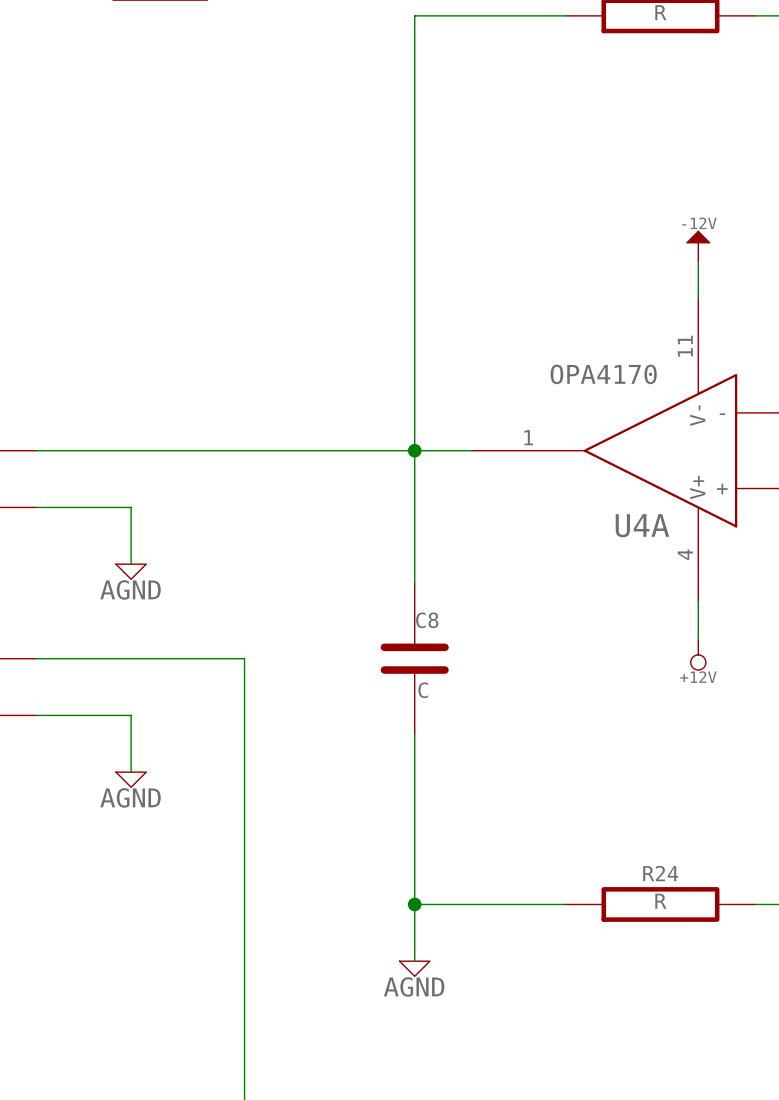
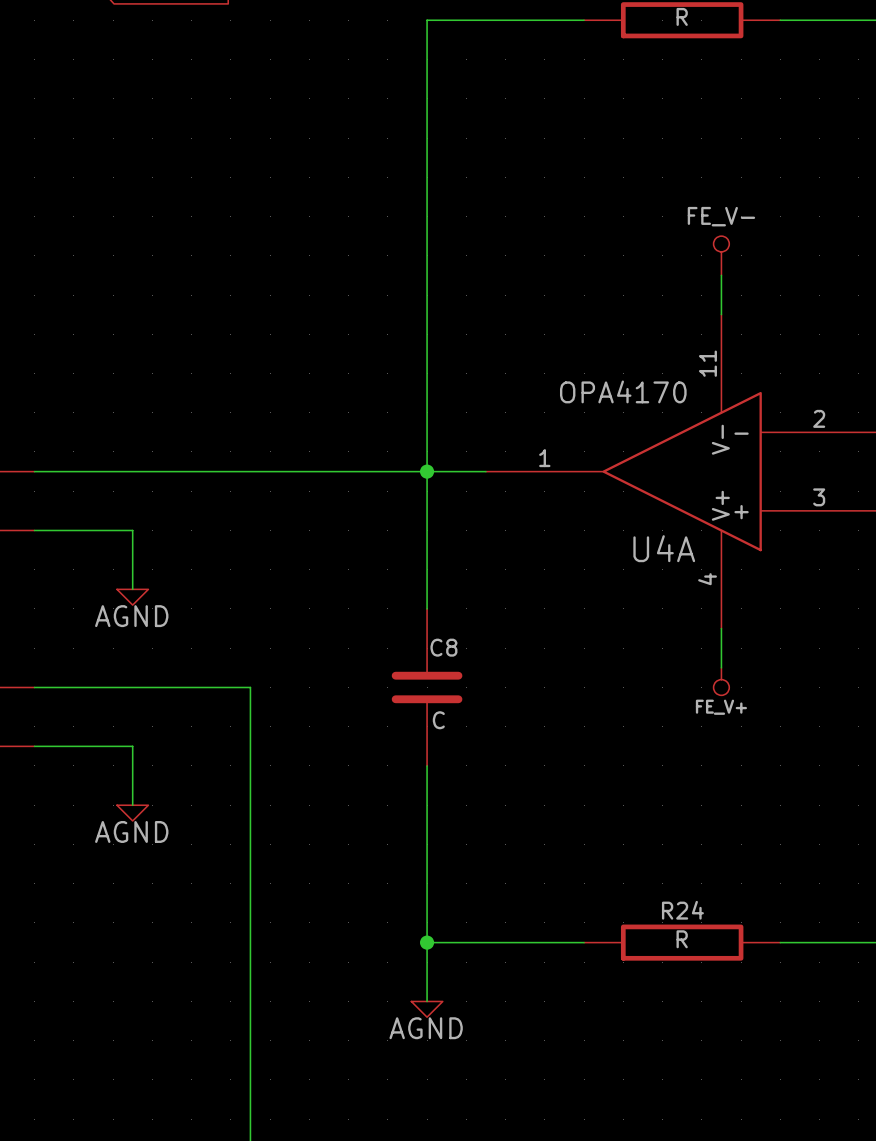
power symbol: -12V (698, 246) -> FE_V- (721, 255)
power symbol: +12V (698, 654) -> FE_V+ (721, 681)

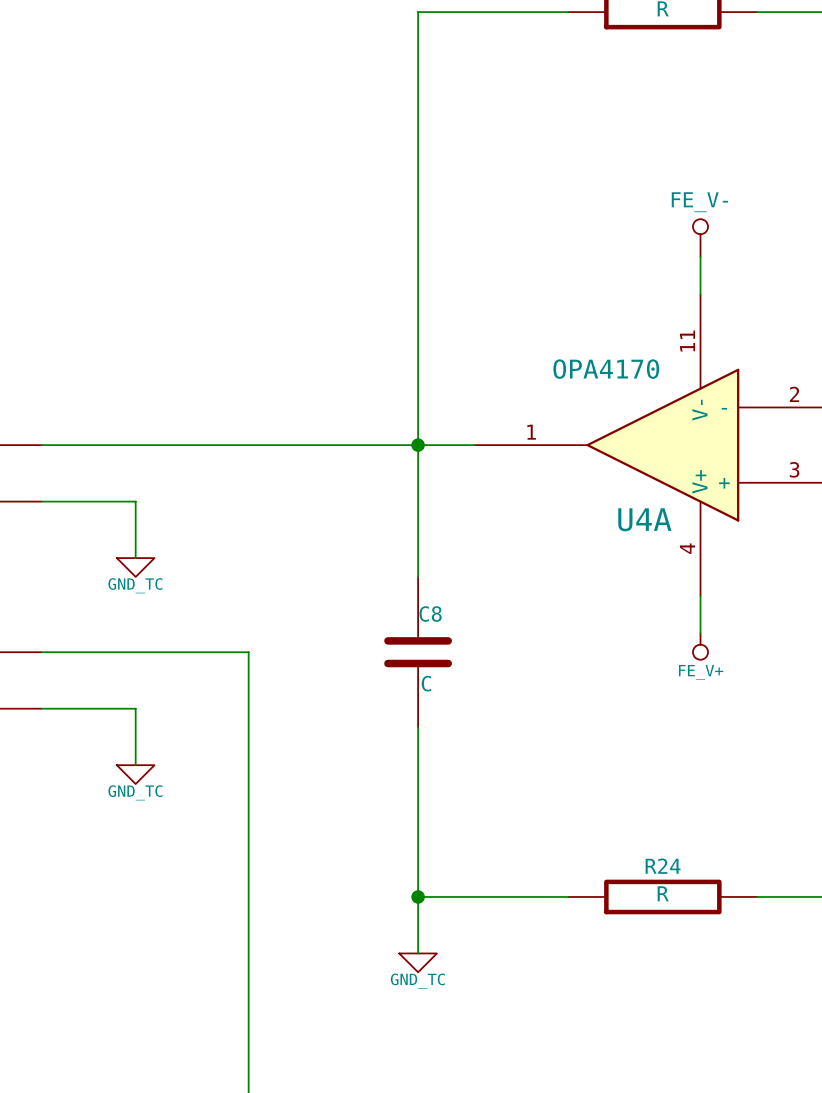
power symbol: AGND (132, 597) -> GND_TC (135, 567)
power symbol: AGND (132, 813) -> GND_TC (135, 774)
power symbol: AGND (427, 1009) -> GND_TC (418, 962)

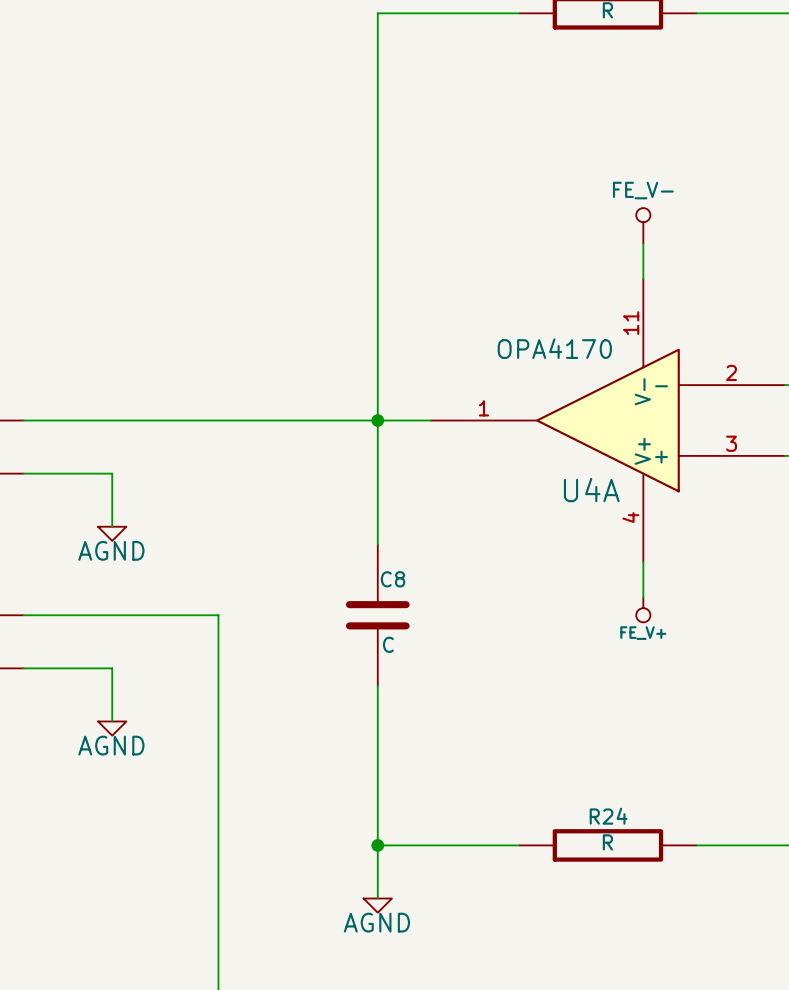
power symbol: GND_TC (135, 567) -> AGND (112, 533)
power symbol: GND_TC (135, 774) -> AGND (112, 728)
power symbol: GND_TC (418, 962) -> AGND (377, 905)

